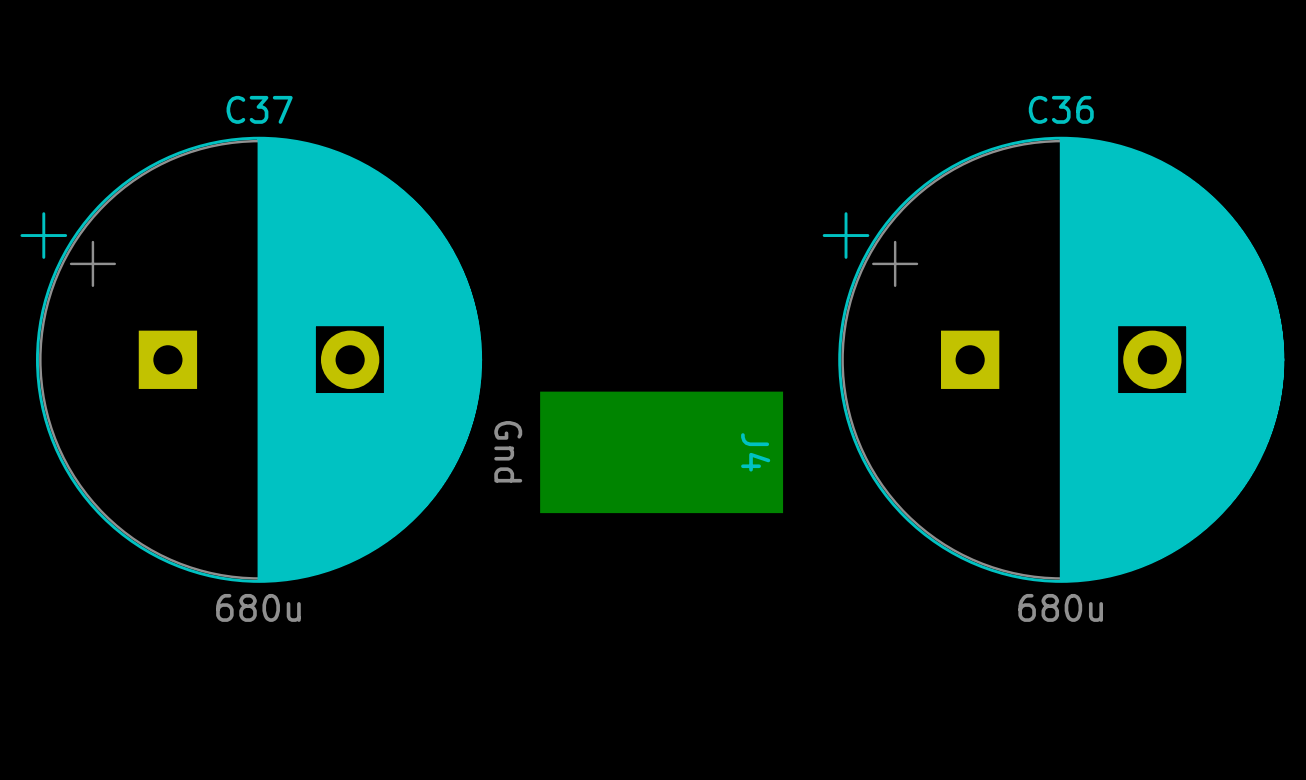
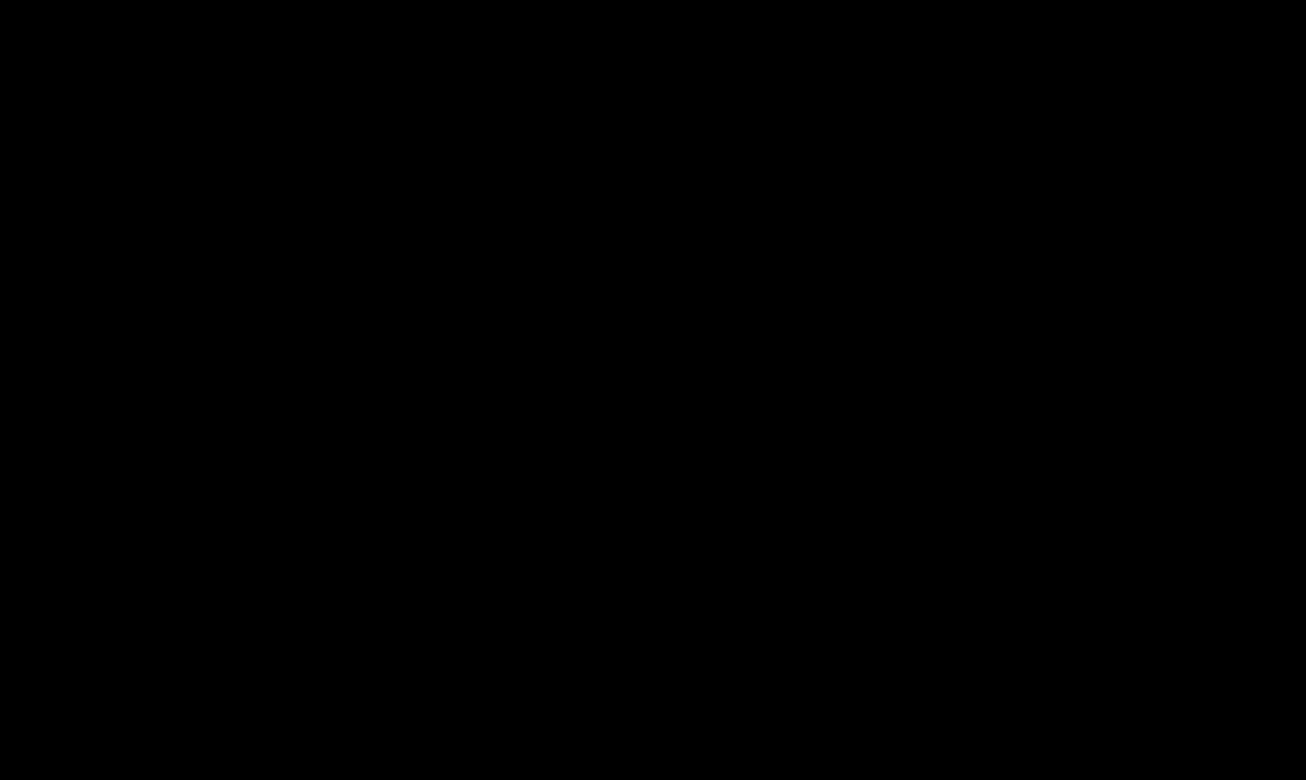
C37: 680u (251, 359) -> none
C36: 680u (1053, 359) -> none
J4: Gnd (661, 452) -> none

